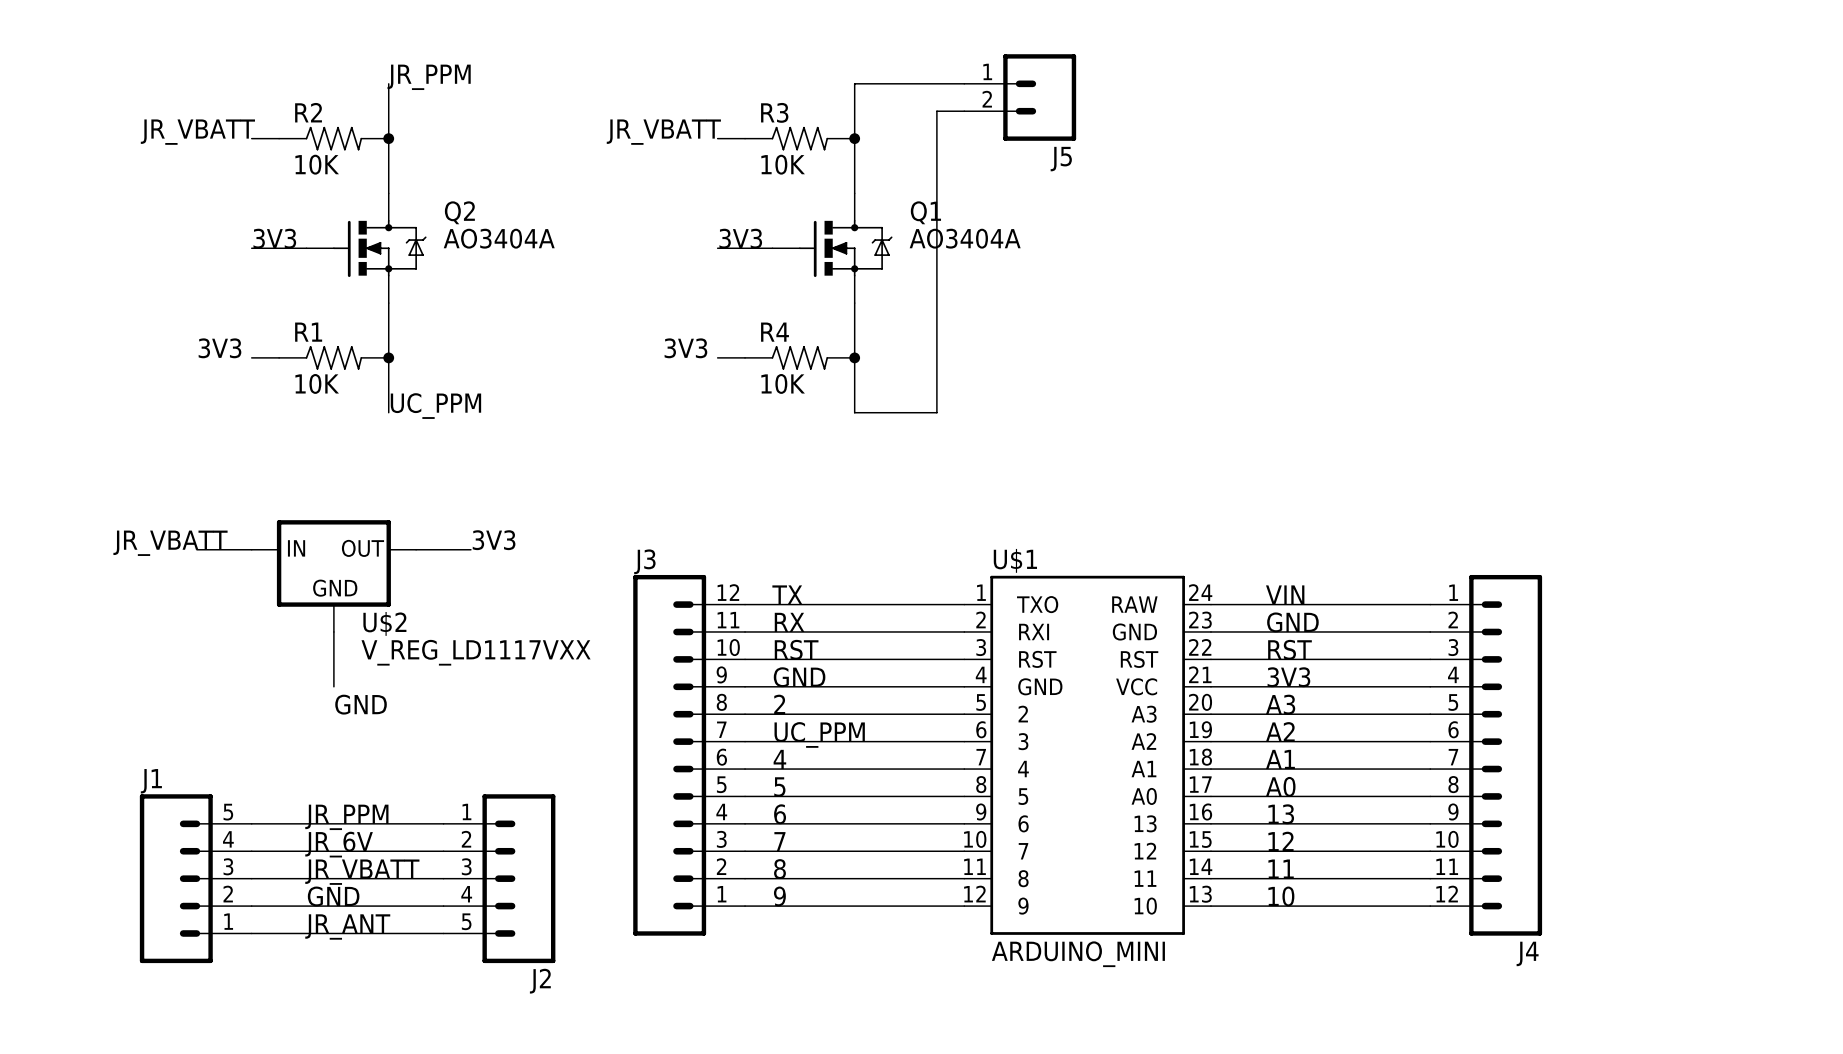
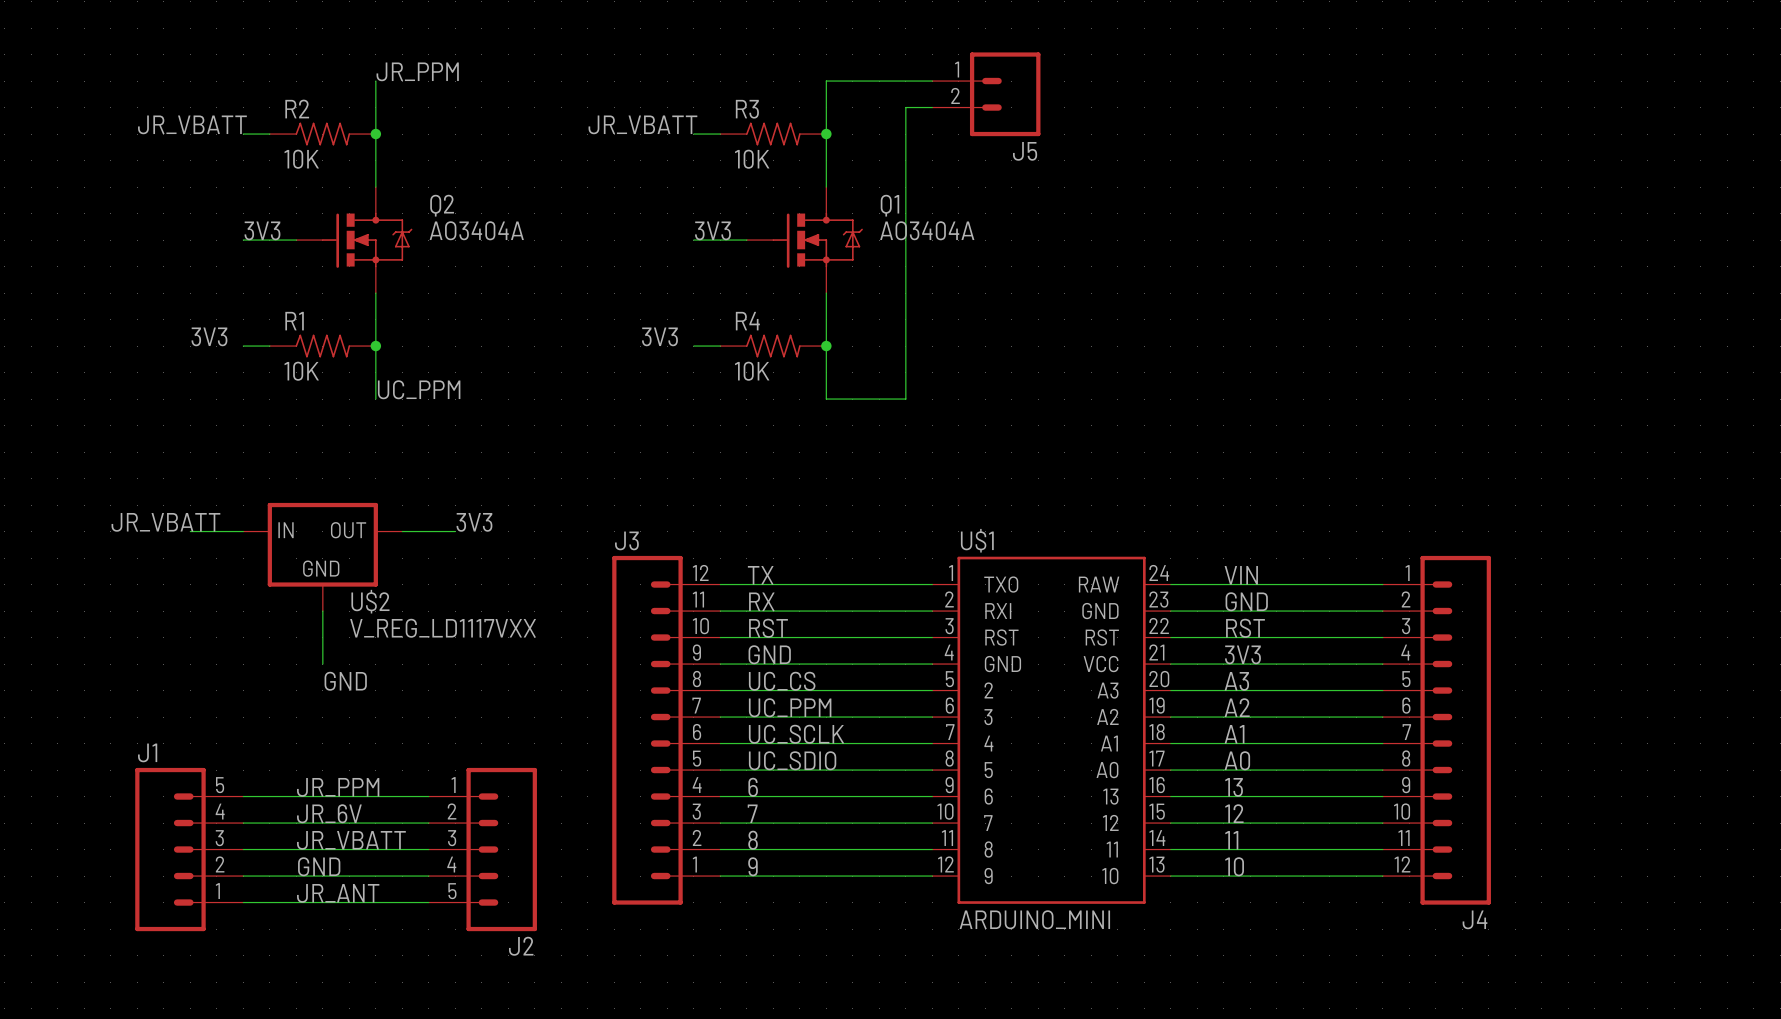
label: 2 (779, 704) -> UC_CS (782, 681)
label: 4 (779, 759) -> UC_SCLK (796, 734)
label: 5 (779, 787) -> UC_SDIO (792, 760)

